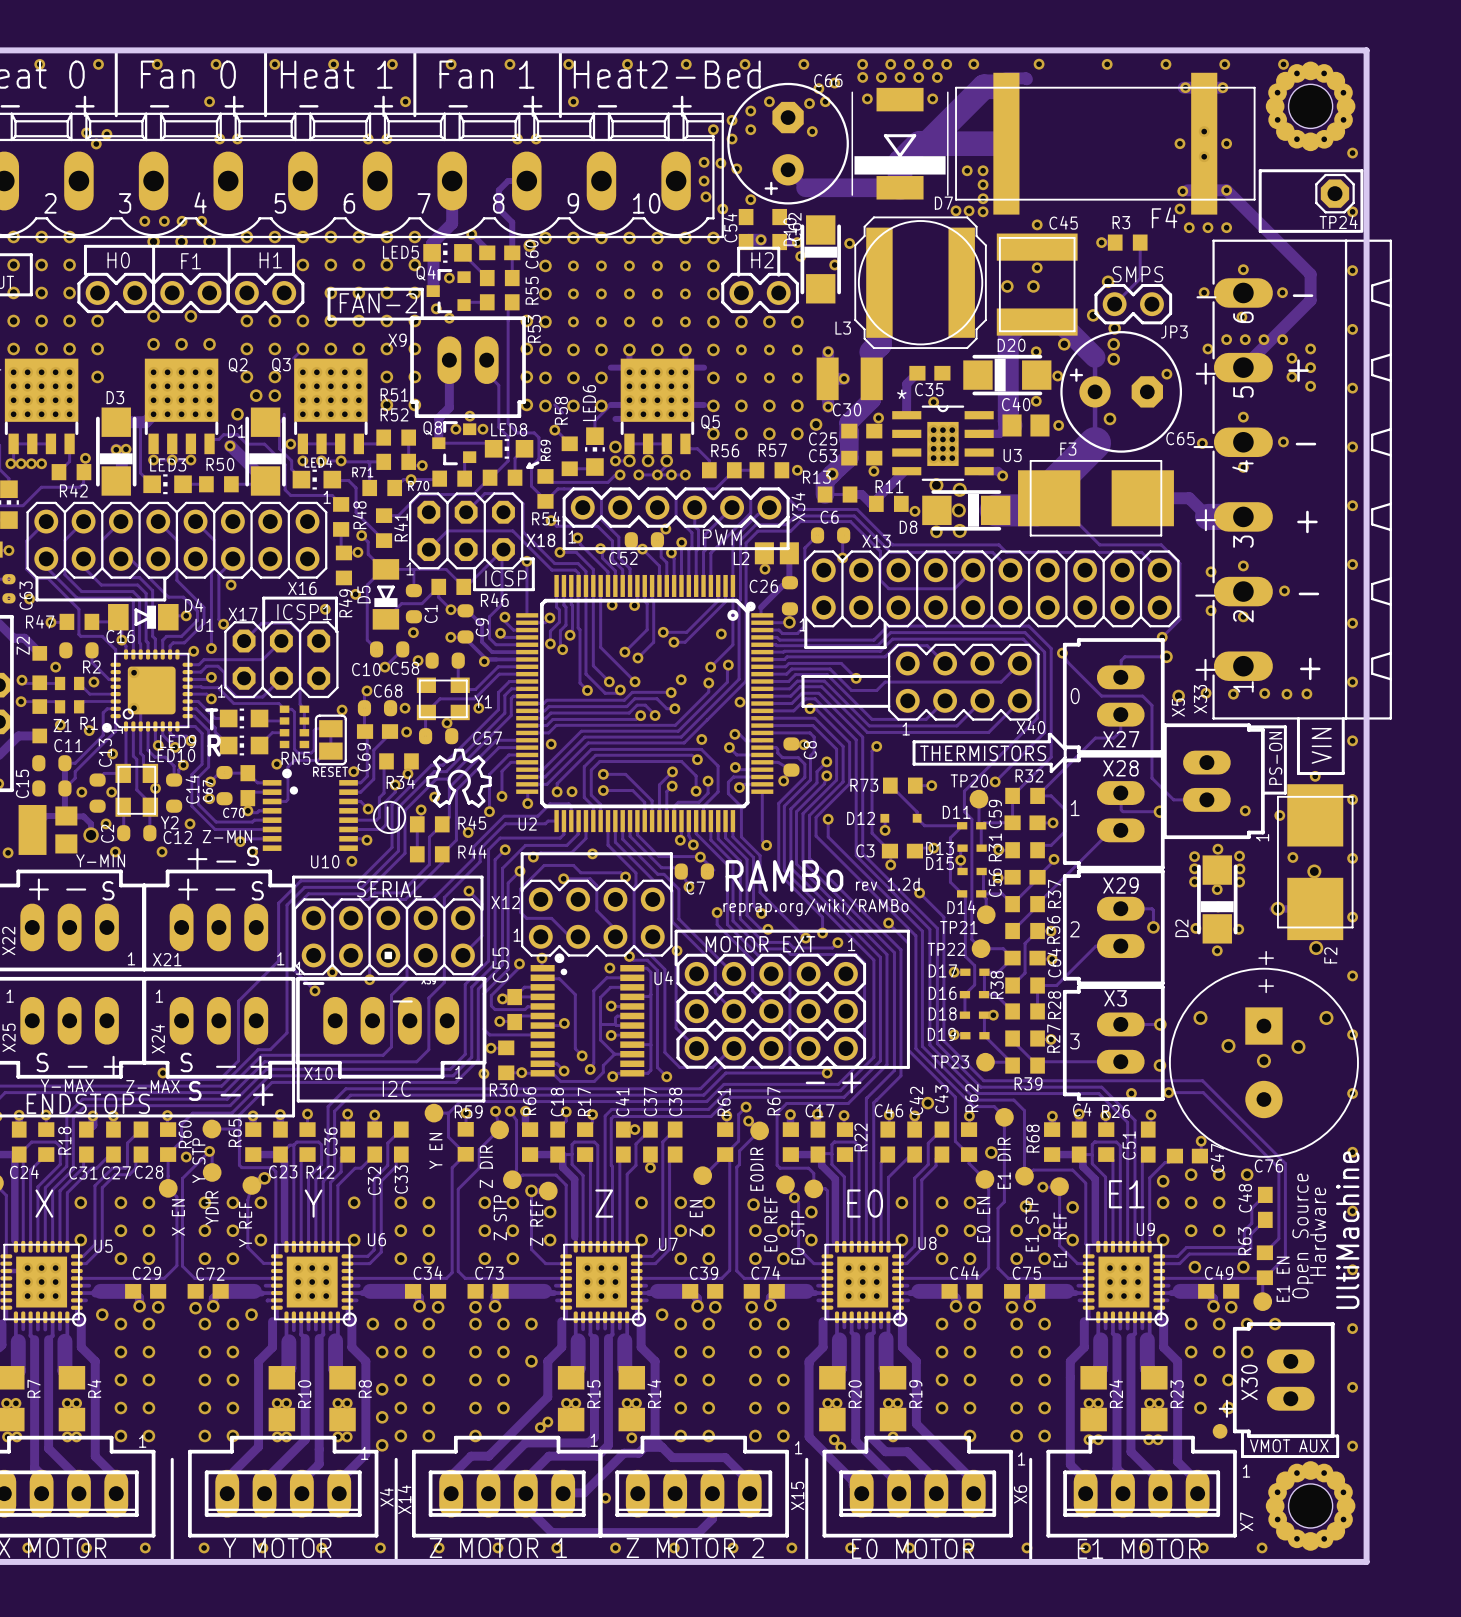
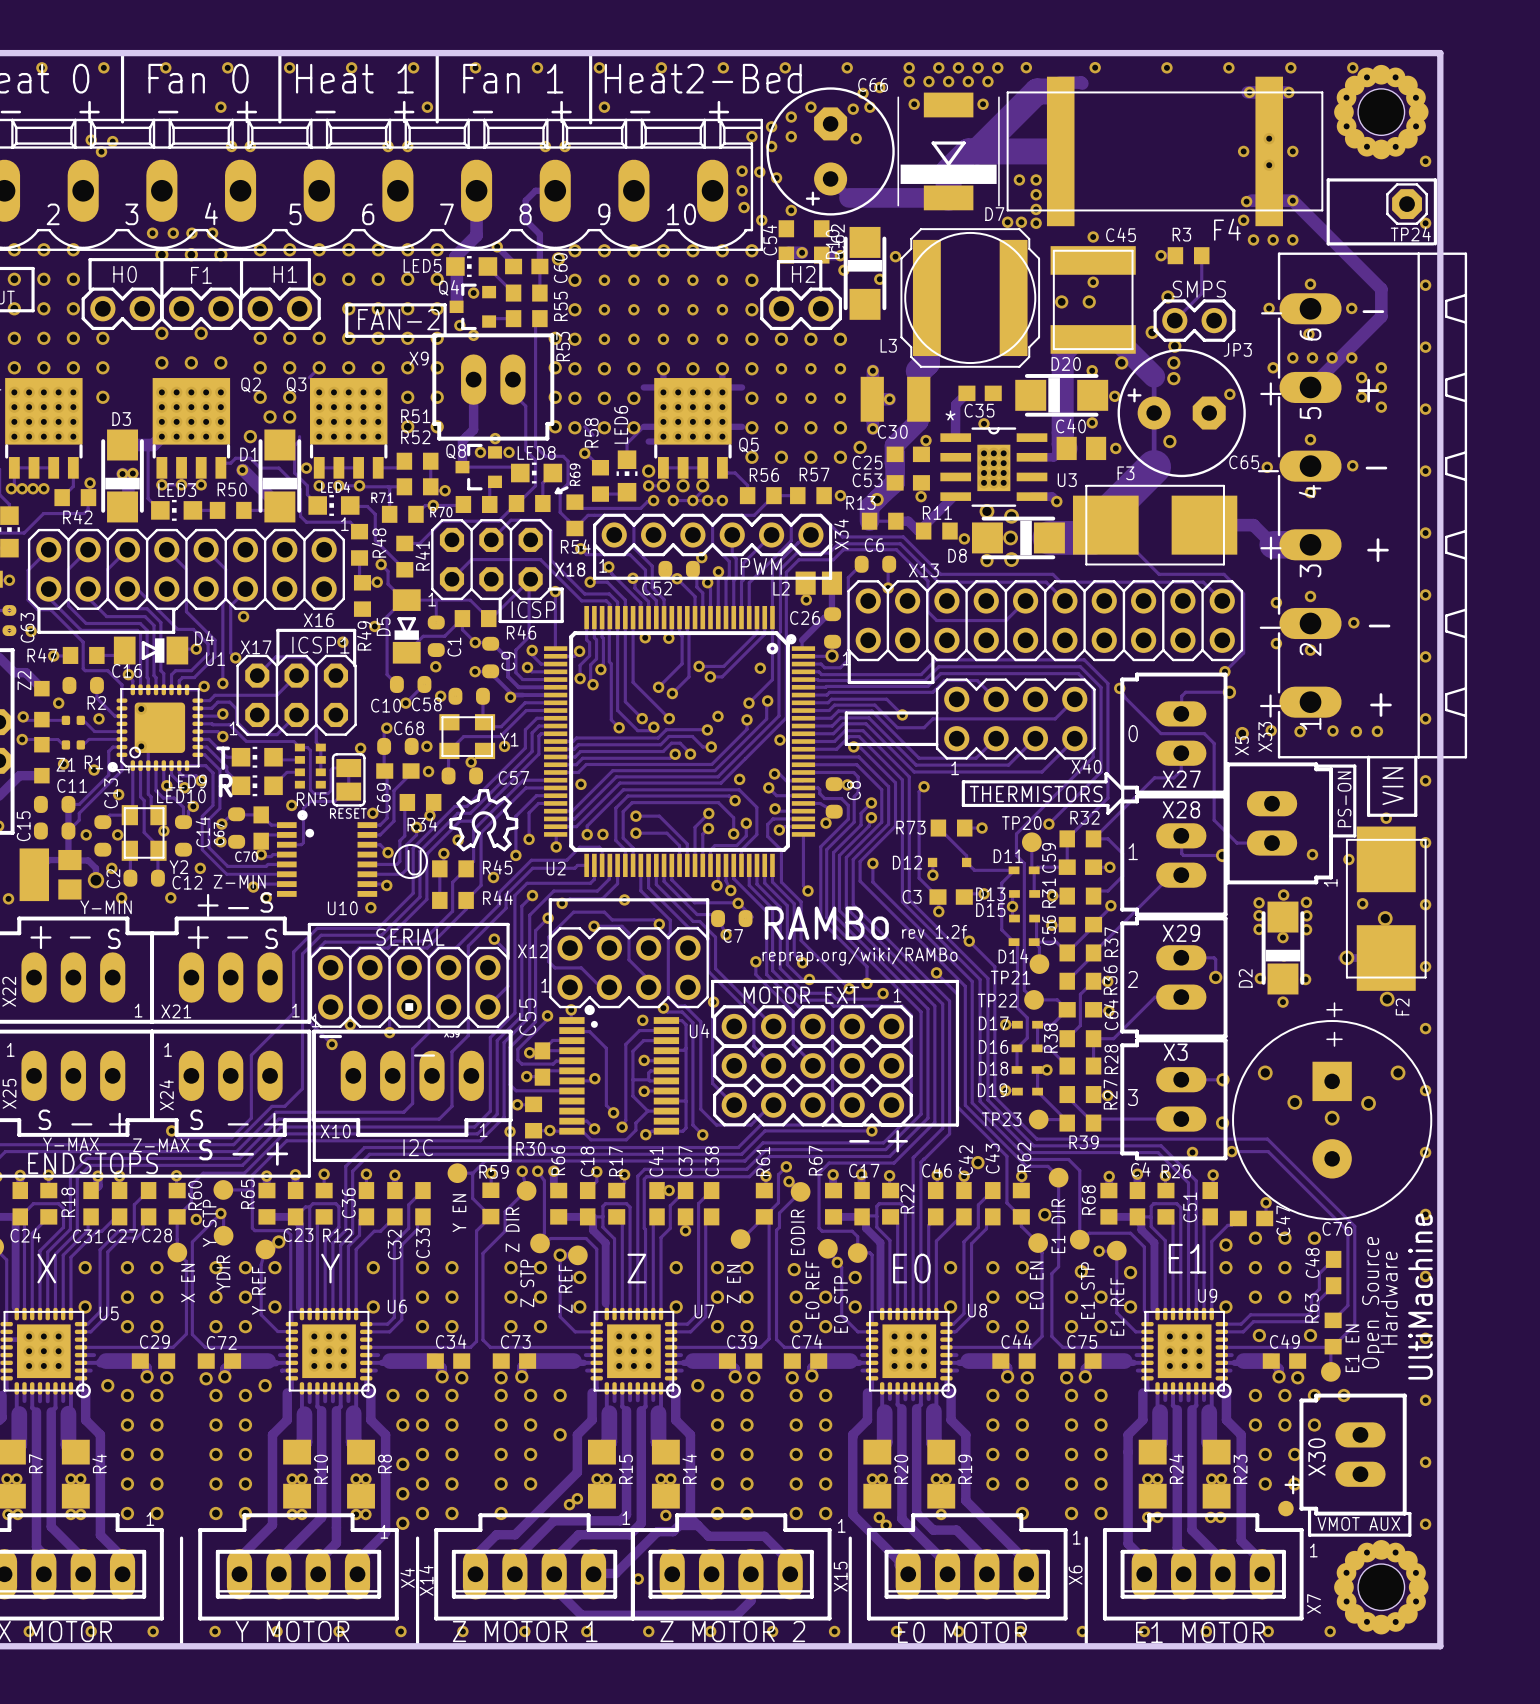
R2 footprint: [54, 676, 85, 691] -> [61, 715, 85, 726]
R1 footprint: [54, 700, 85, 714] -> [61, 740, 85, 750]
text: rev 1.2d (887, 884) -> rev 1.2f (934, 931)

